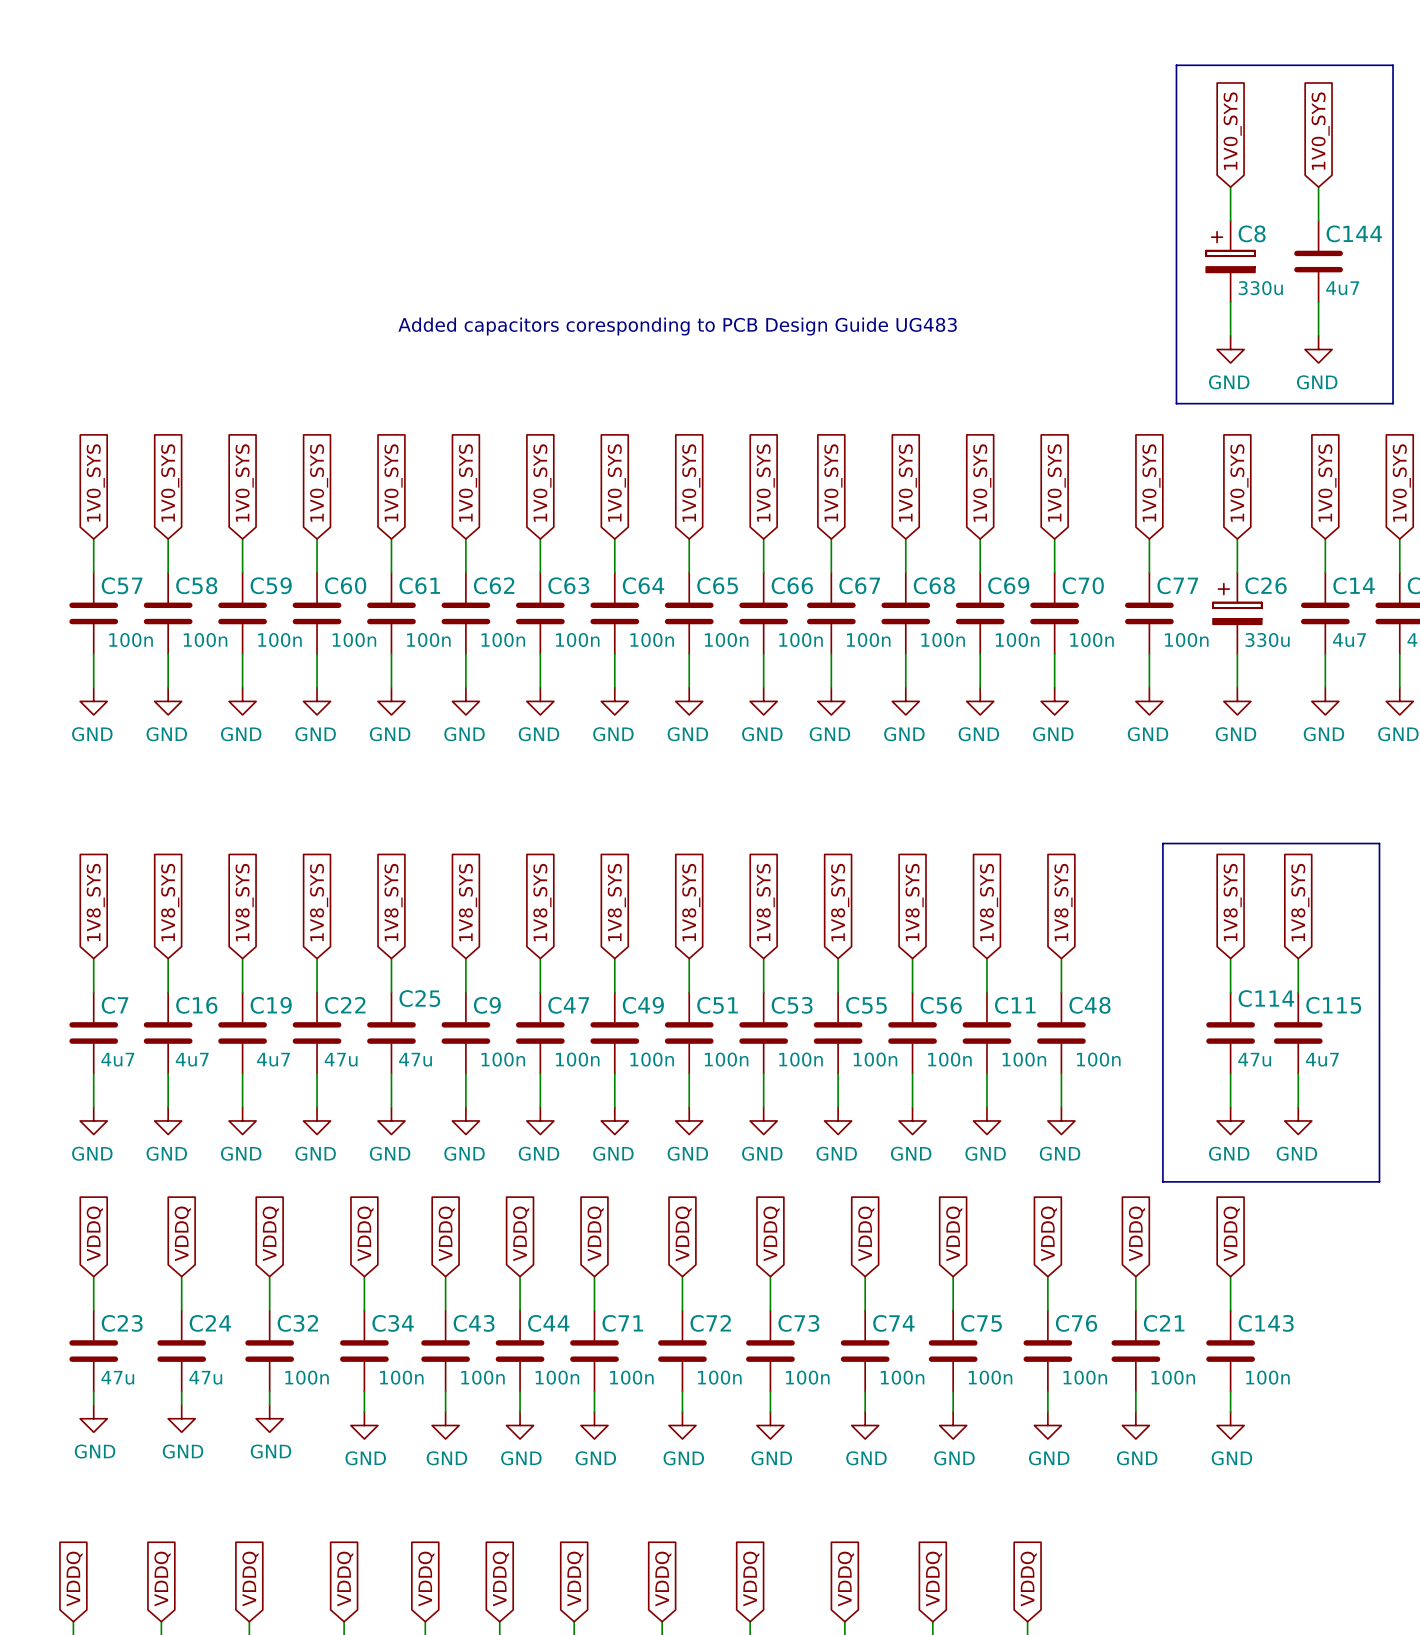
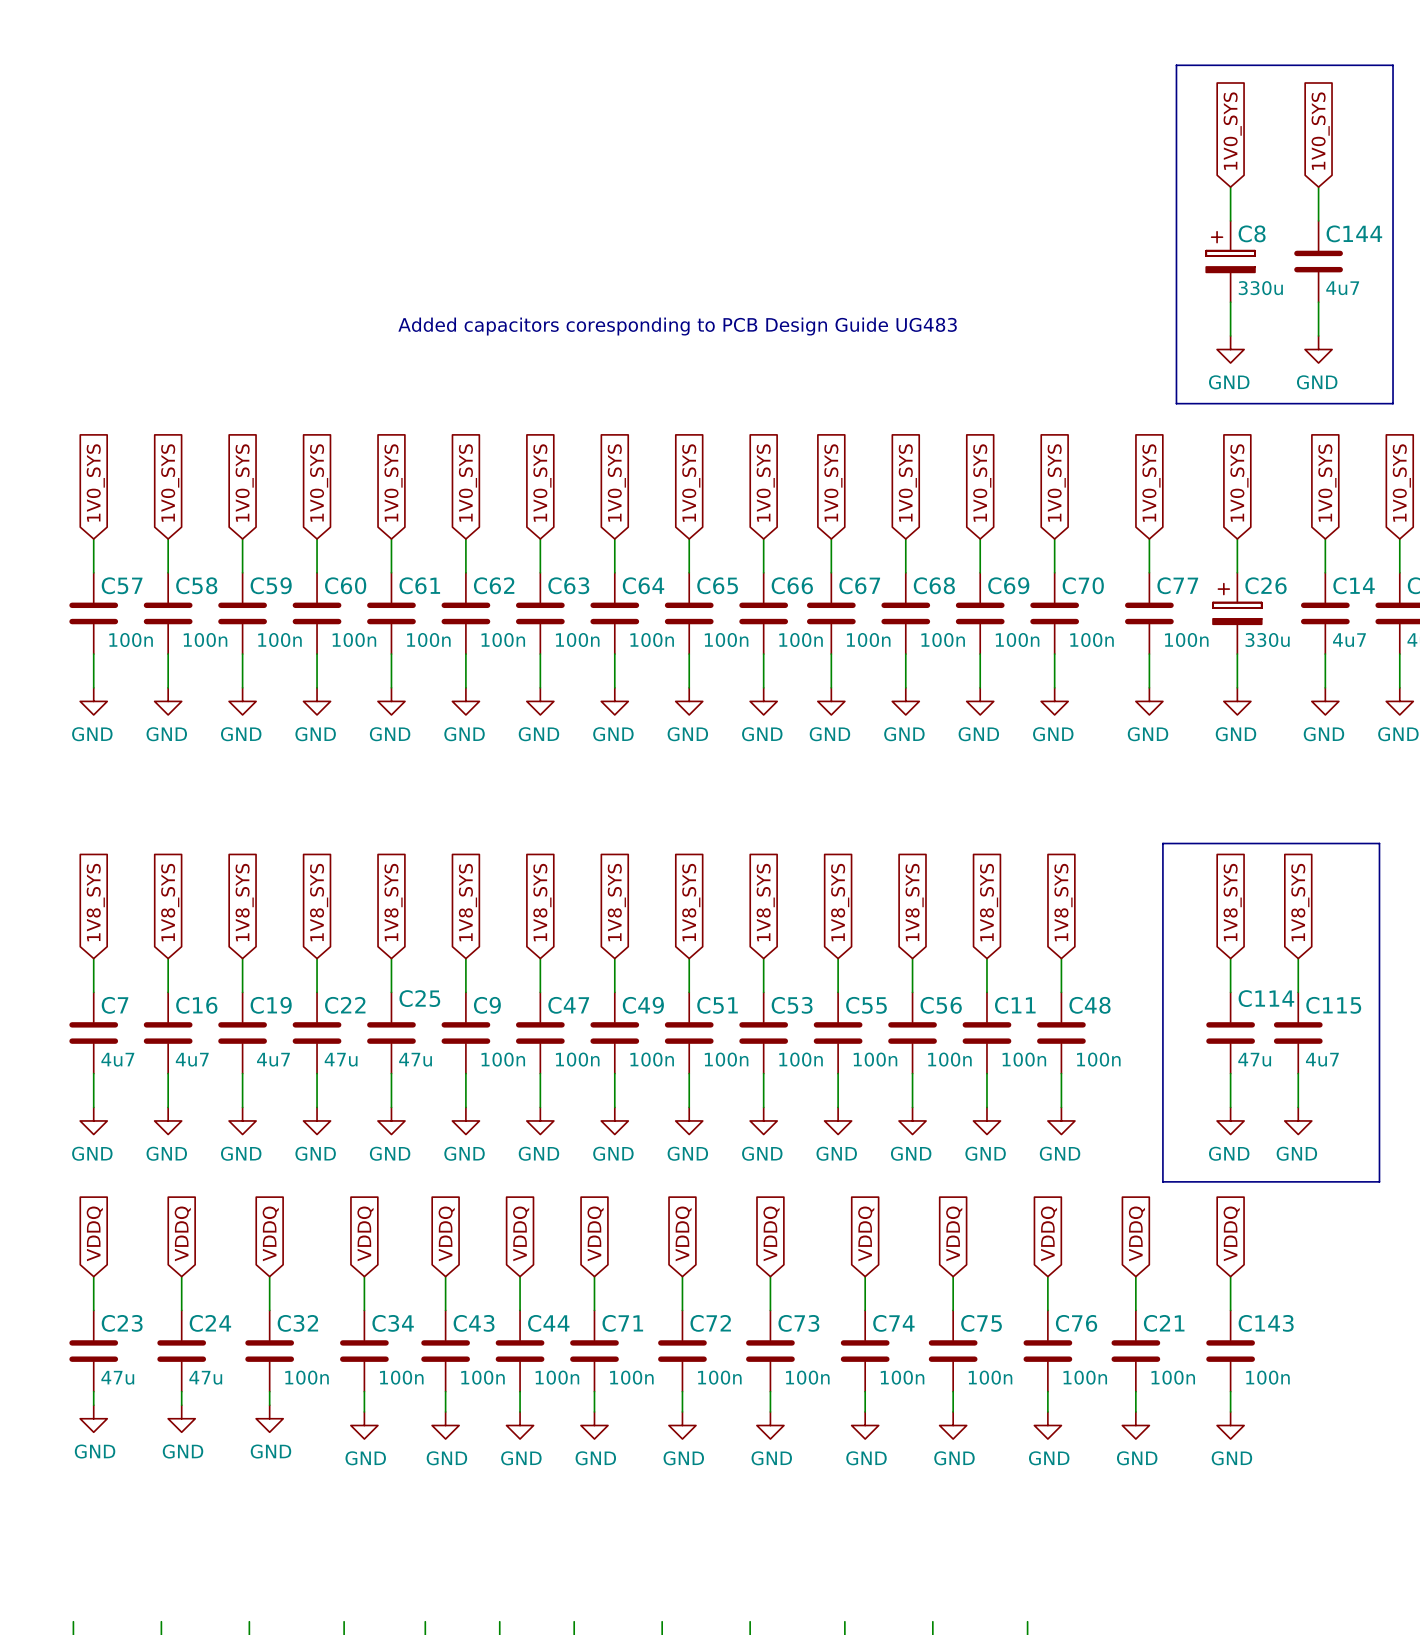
global label: VDDQ (74, 1579) -> none
global label: VDDQ (162, 1579) -> none
global label: VDDQ (250, 1579) -> none
global label: VDDQ (345, 1579) -> none
global label: VDDQ (426, 1579) -> none
global label: VDDQ (500, 1579) -> none
global label: VDDQ (575, 1579) -> none
global label: VDDQ (663, 1579) -> none
global label: VDDQ (751, 1579) -> none
global label: VDDQ (845, 1579) -> none
global label: VDDQ (933, 1579) -> none
global label: VDDQ (1028, 1579) -> none

